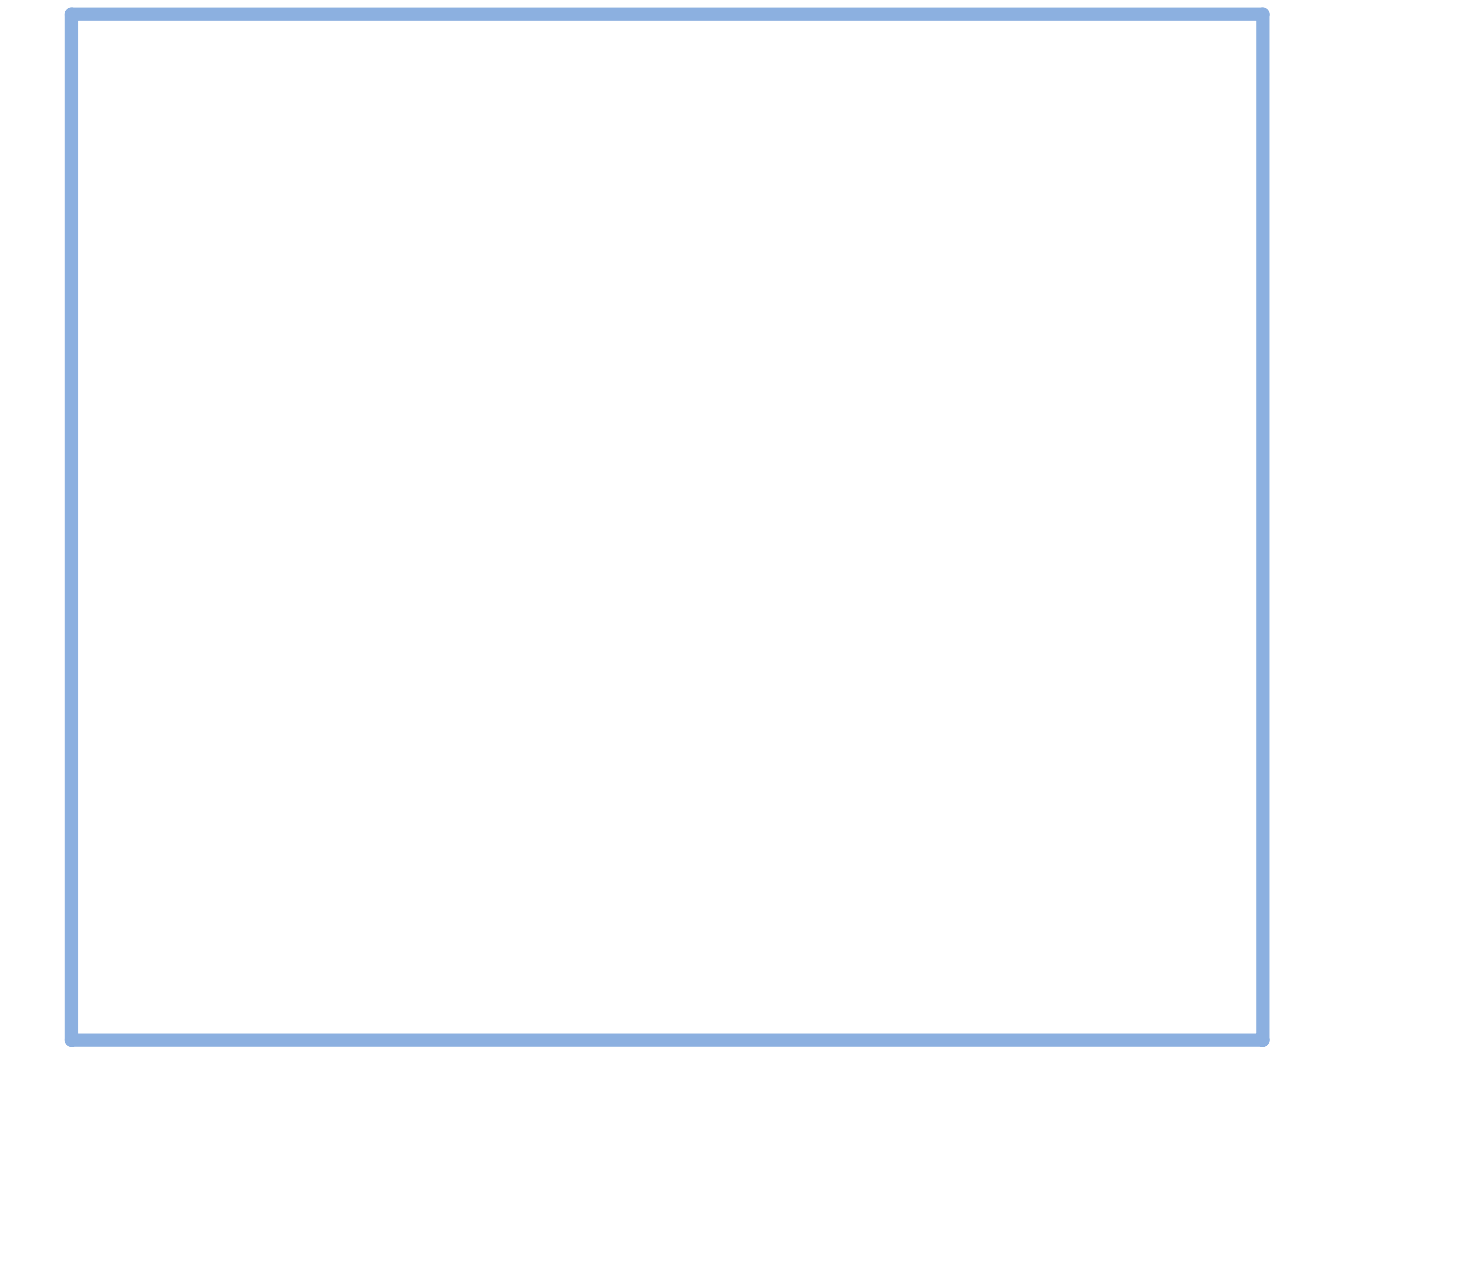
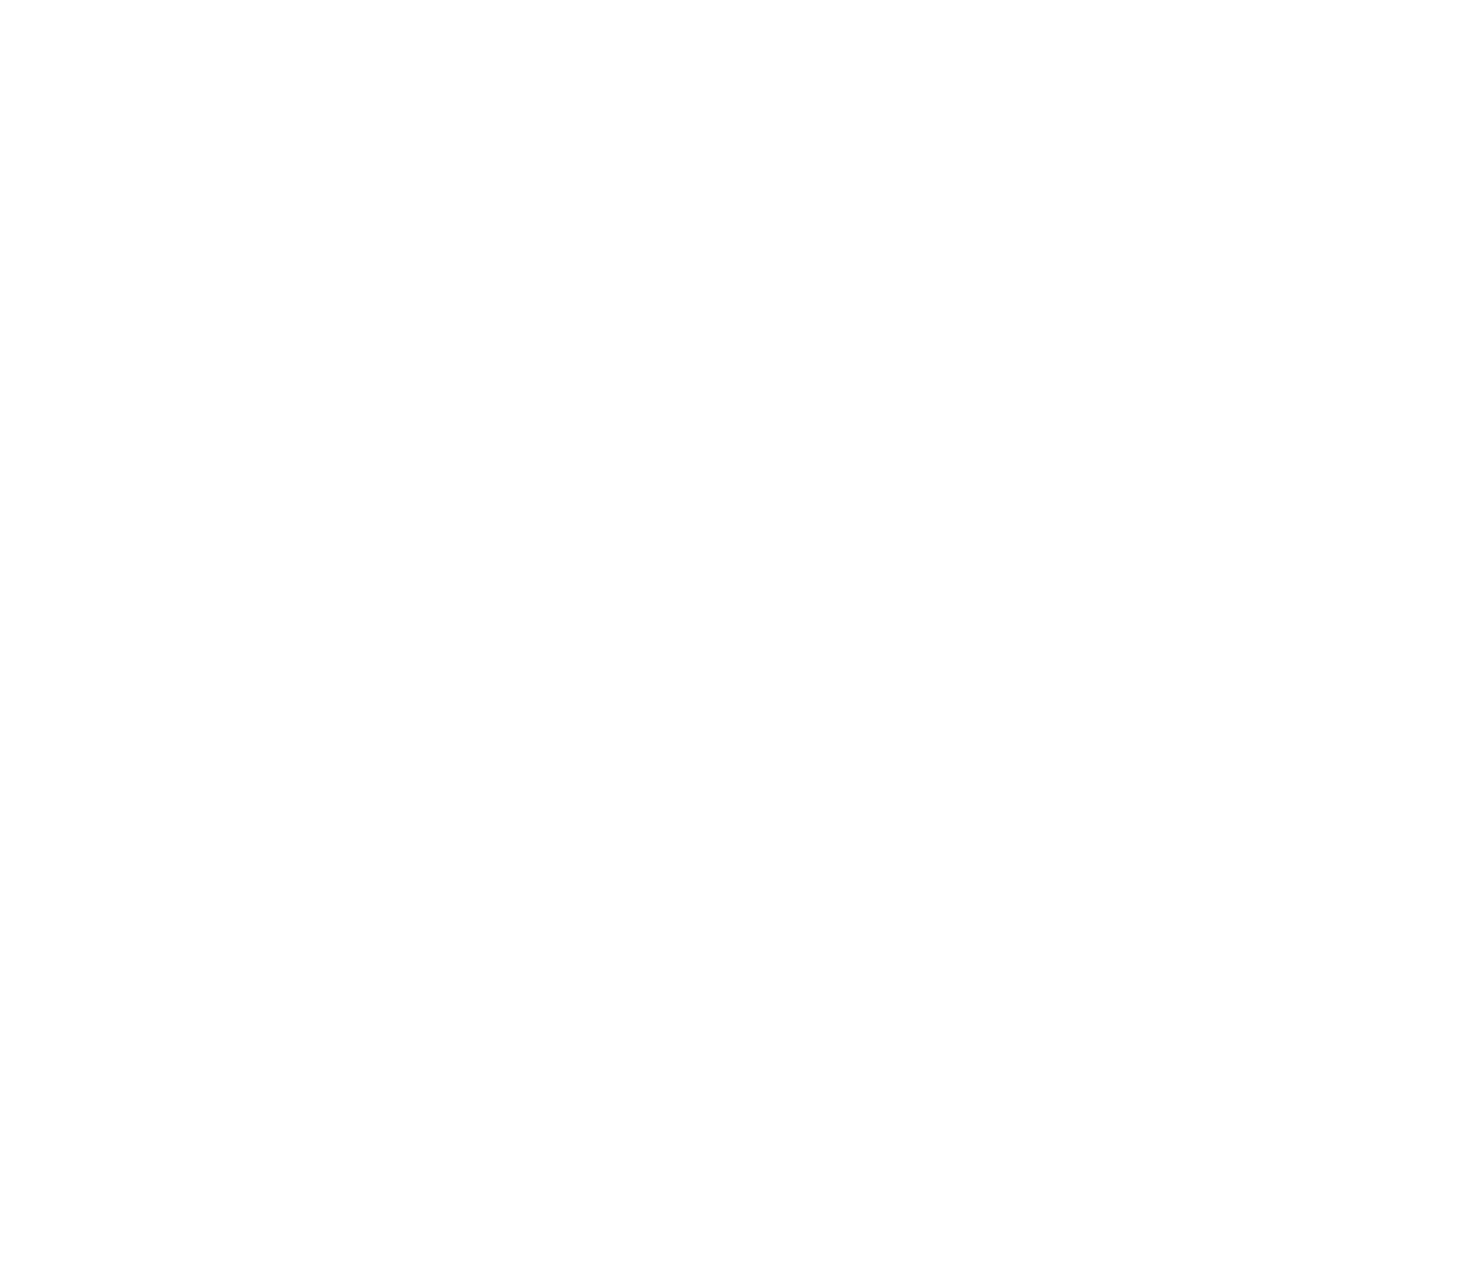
track: (1262, 14) (71, 14) (71, 1040) (1262, 1040) (1262, 14) -> none

